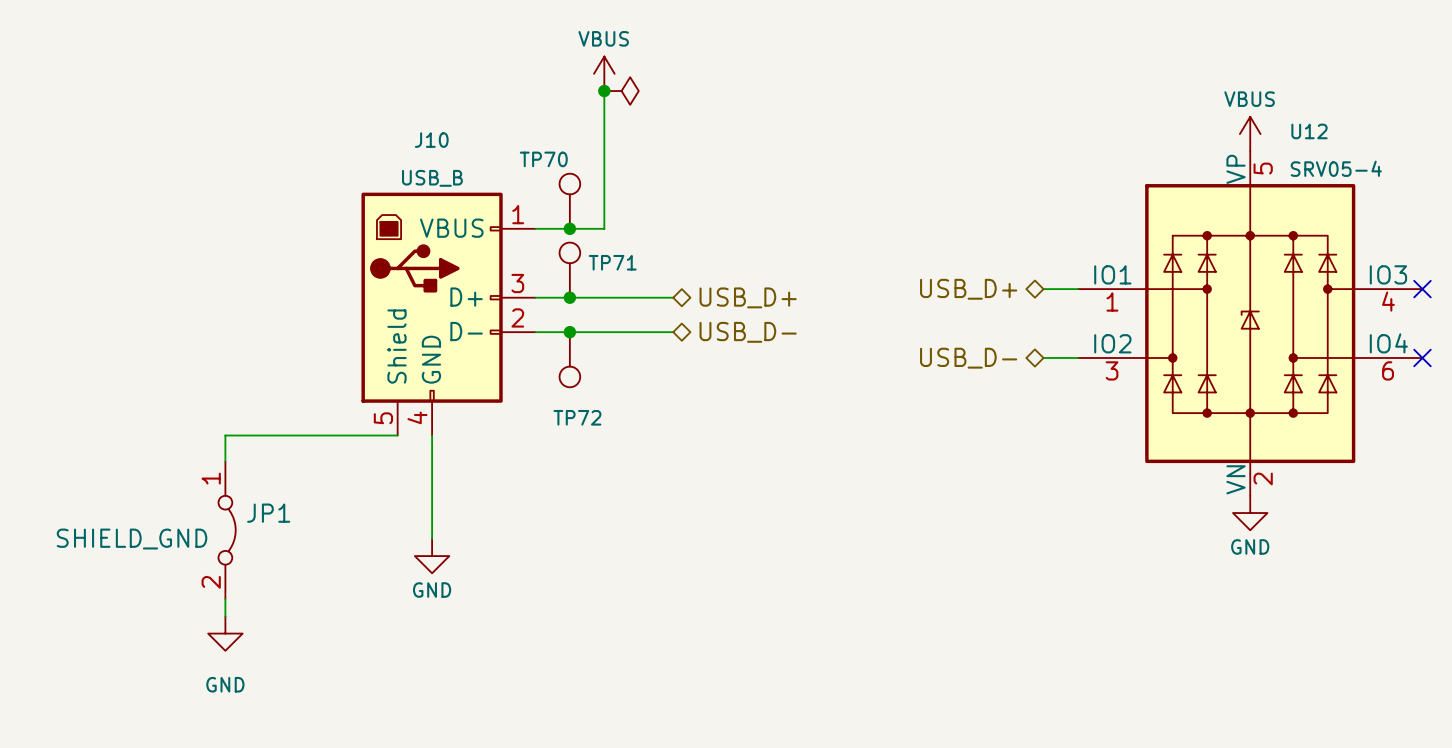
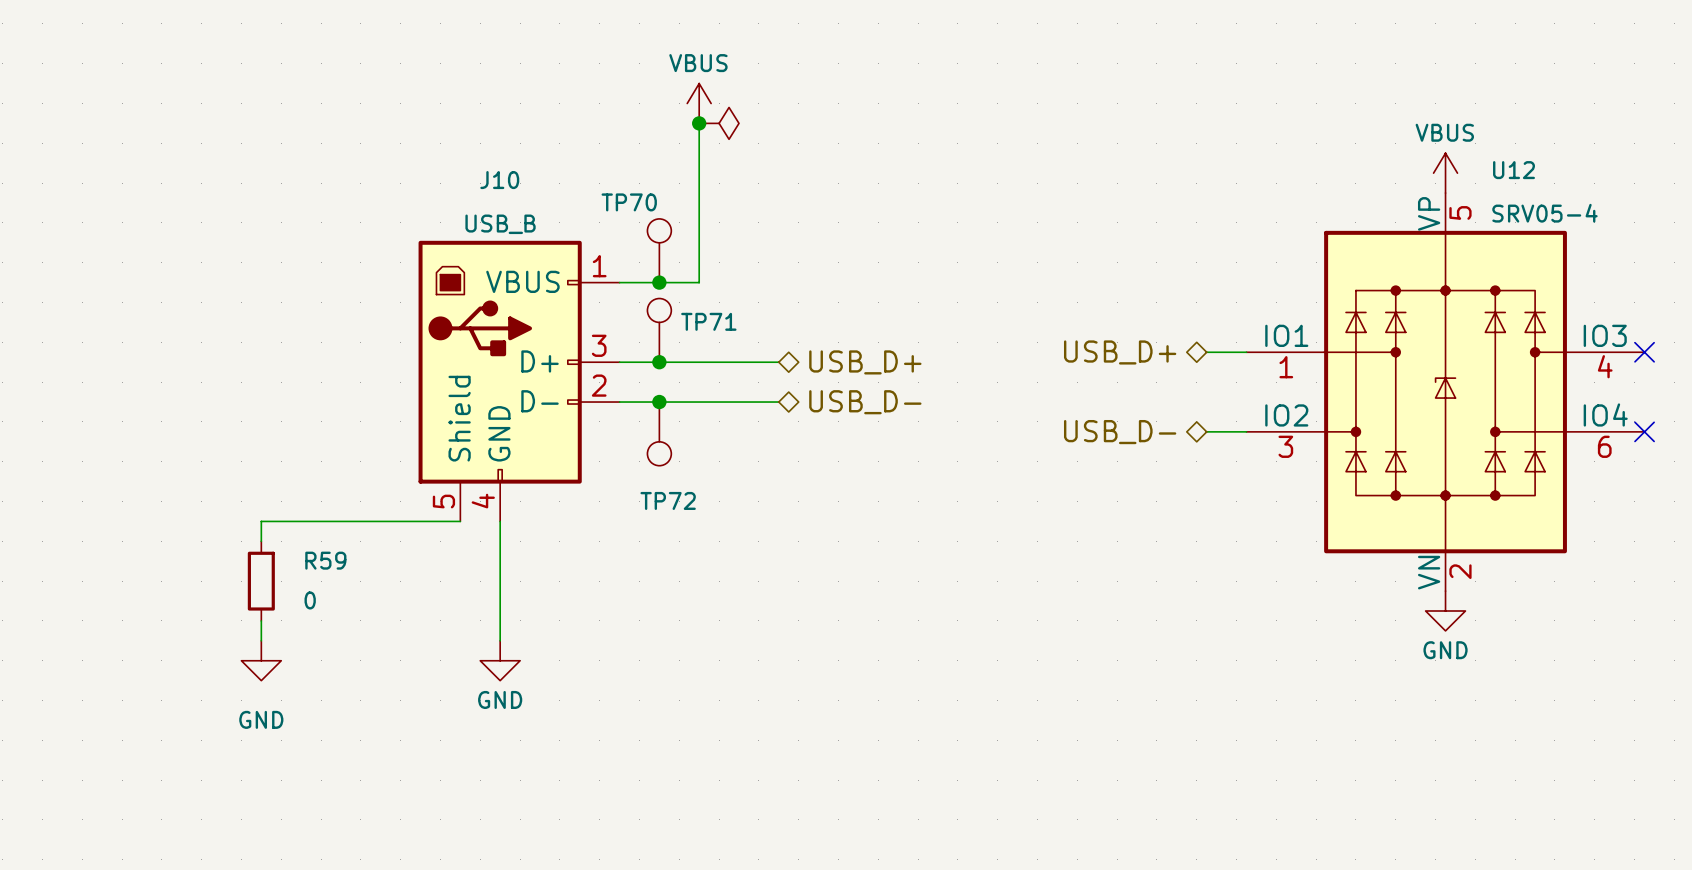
R59: none -> 0 (261, 581)
JP1: SHIELD_GND (227, 530) -> none
wire: (225, 599) (225, 616) -> (261, 620) (261, 640)
power symbol position: GND (225, 633) -> GND (261, 660)

